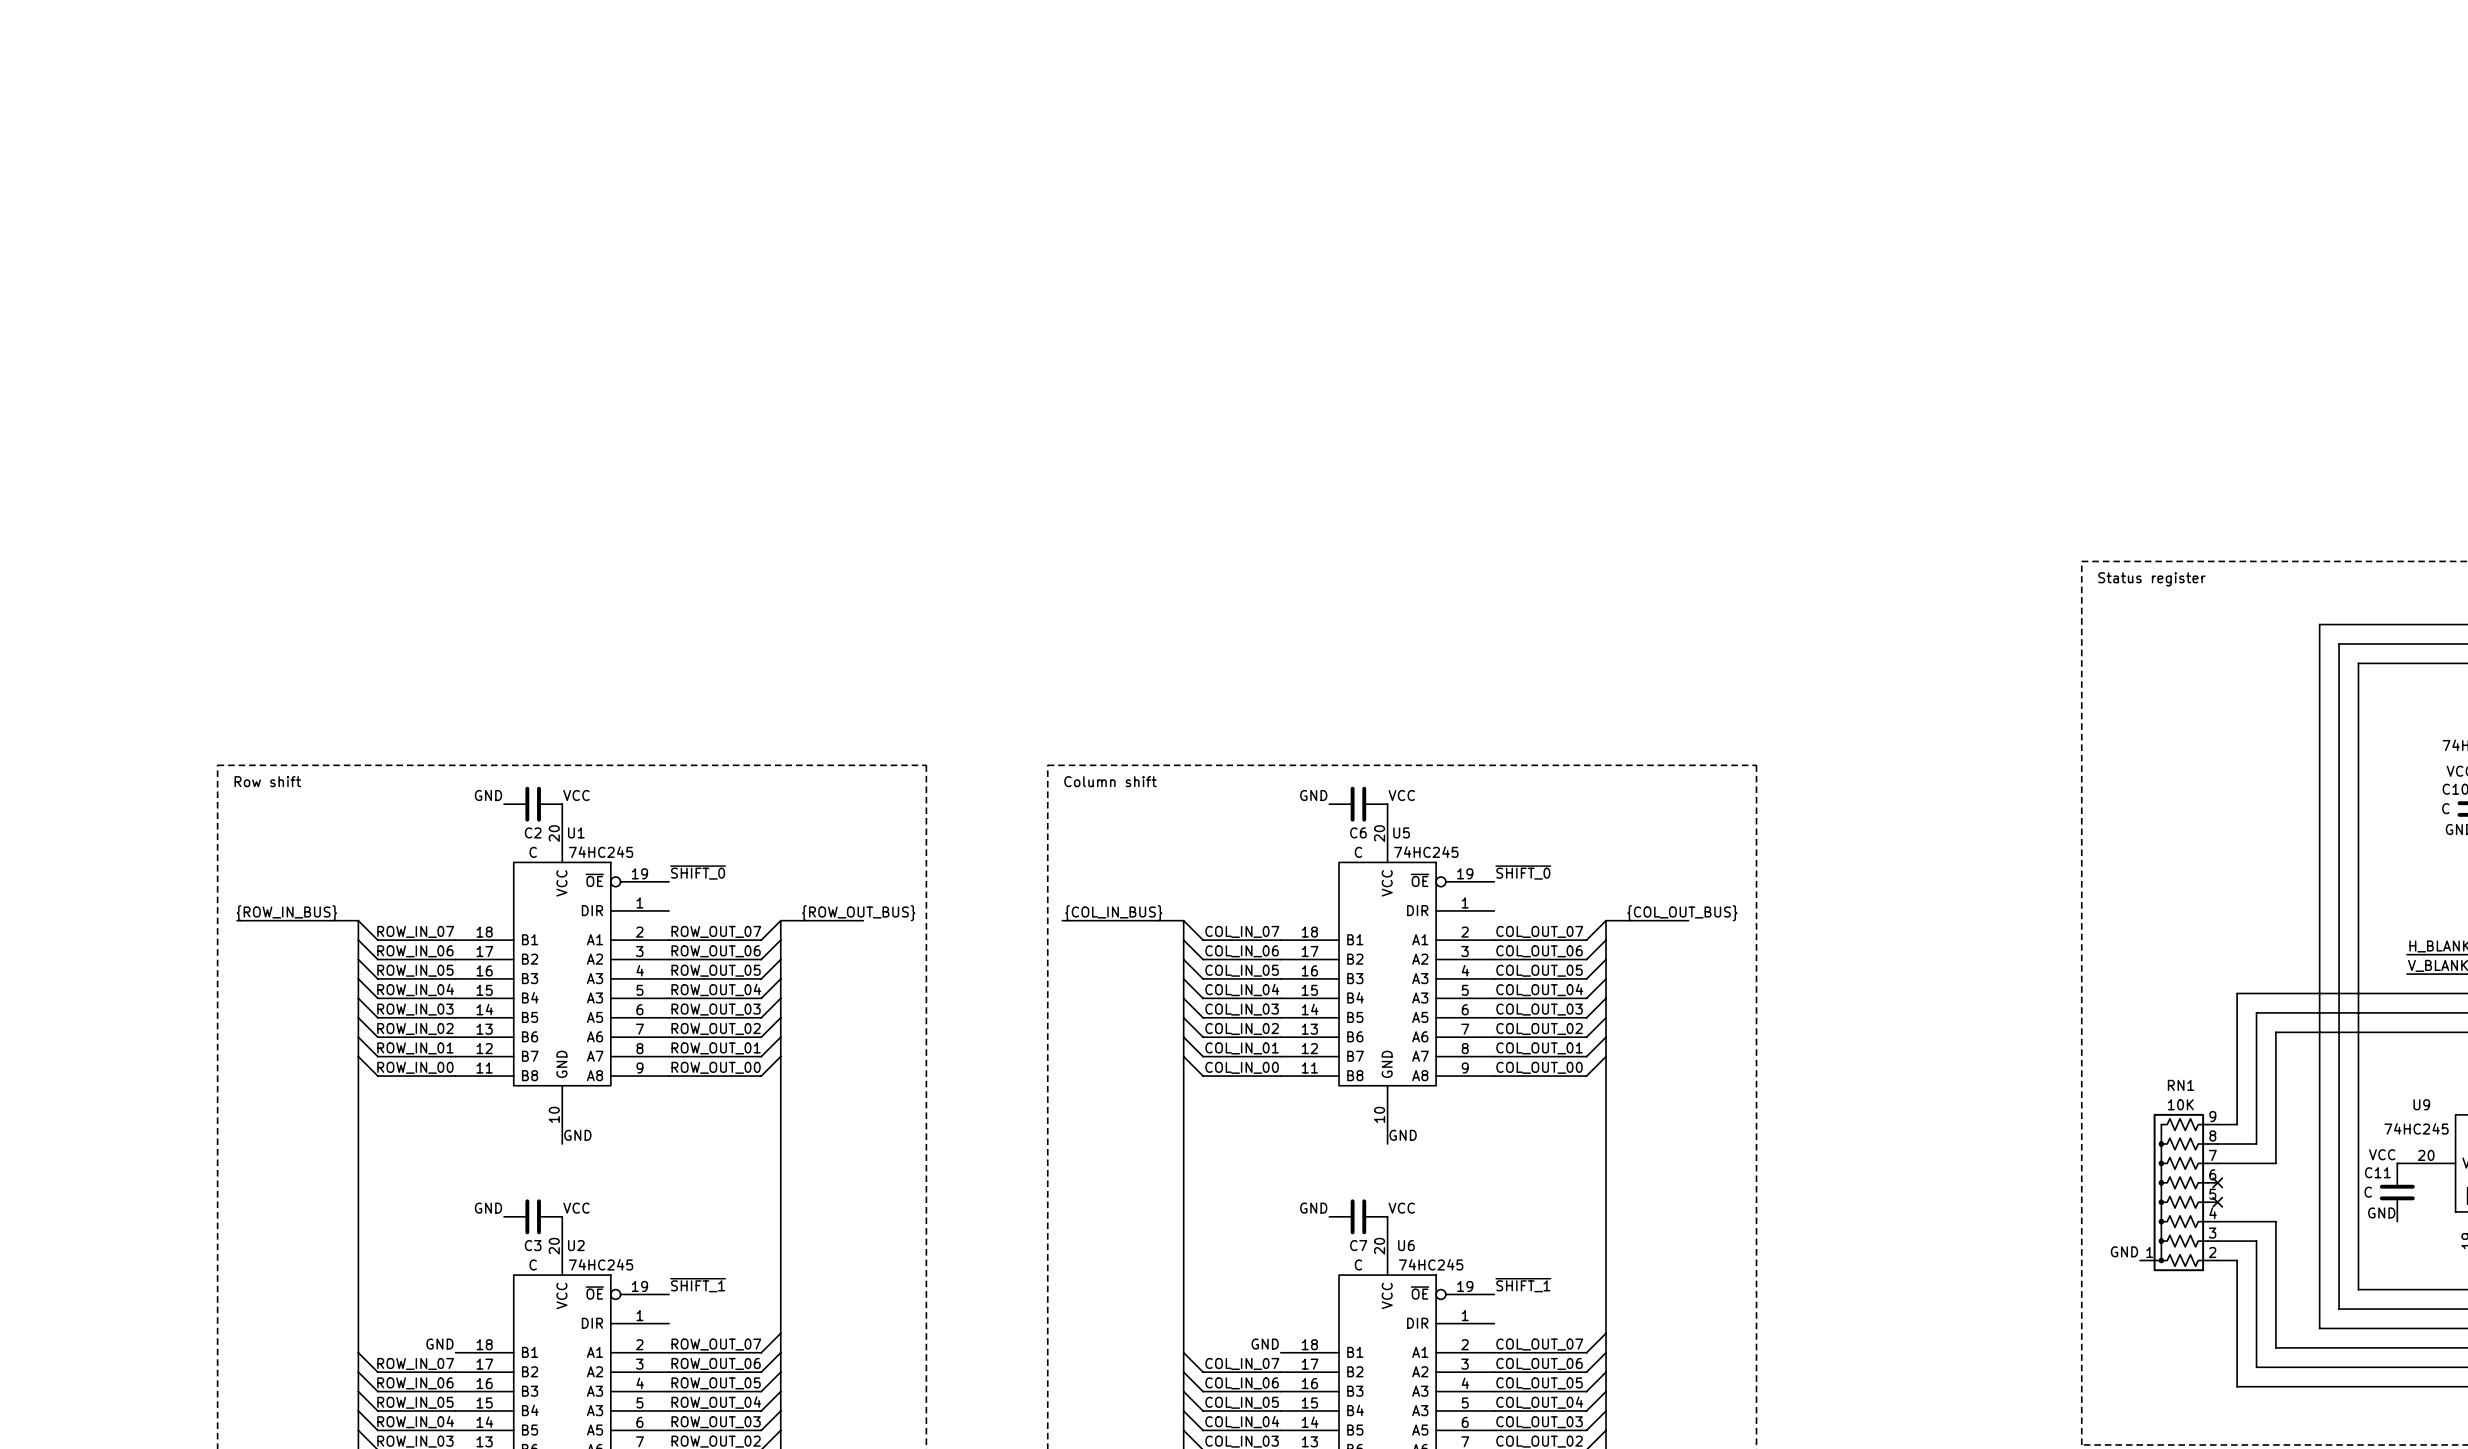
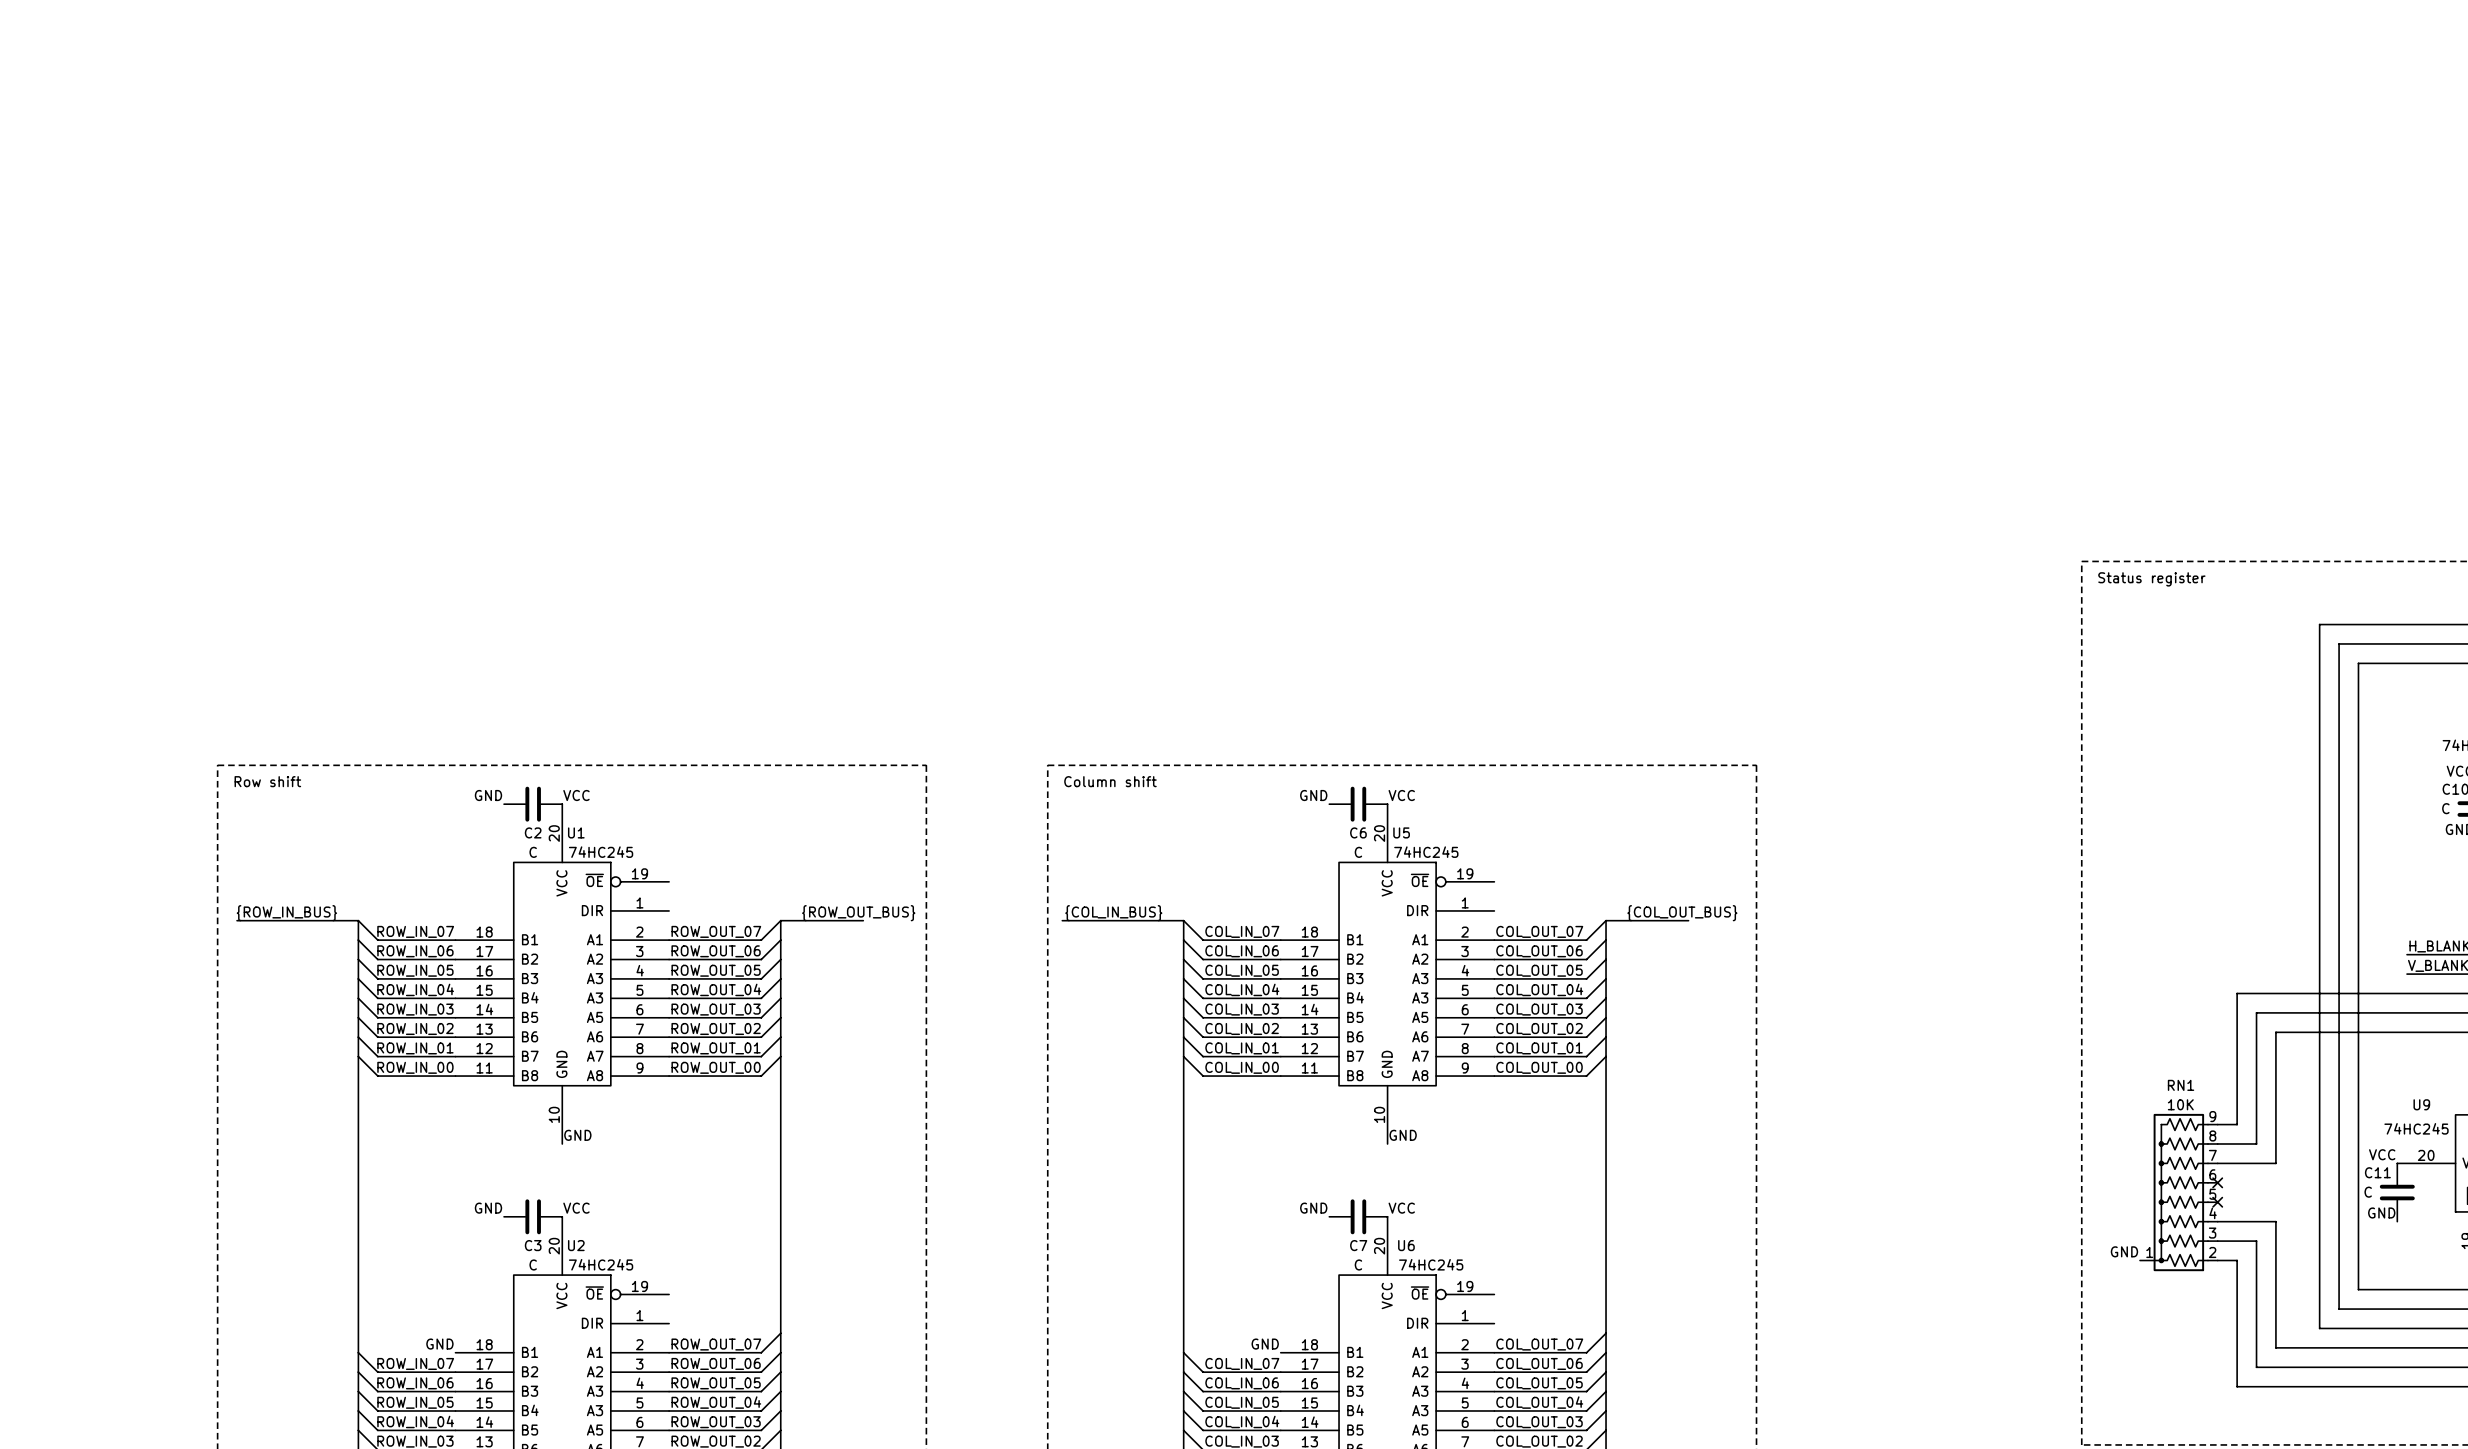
label: ~{SHIFT_0} (698, 872) -> none
label: ~{SHIFT_0} (1523, 872) -> none
label: ~{SHIFT_1} (698, 1285) -> none
label: ~{SHIFT_1} (1523, 1285) -> none

